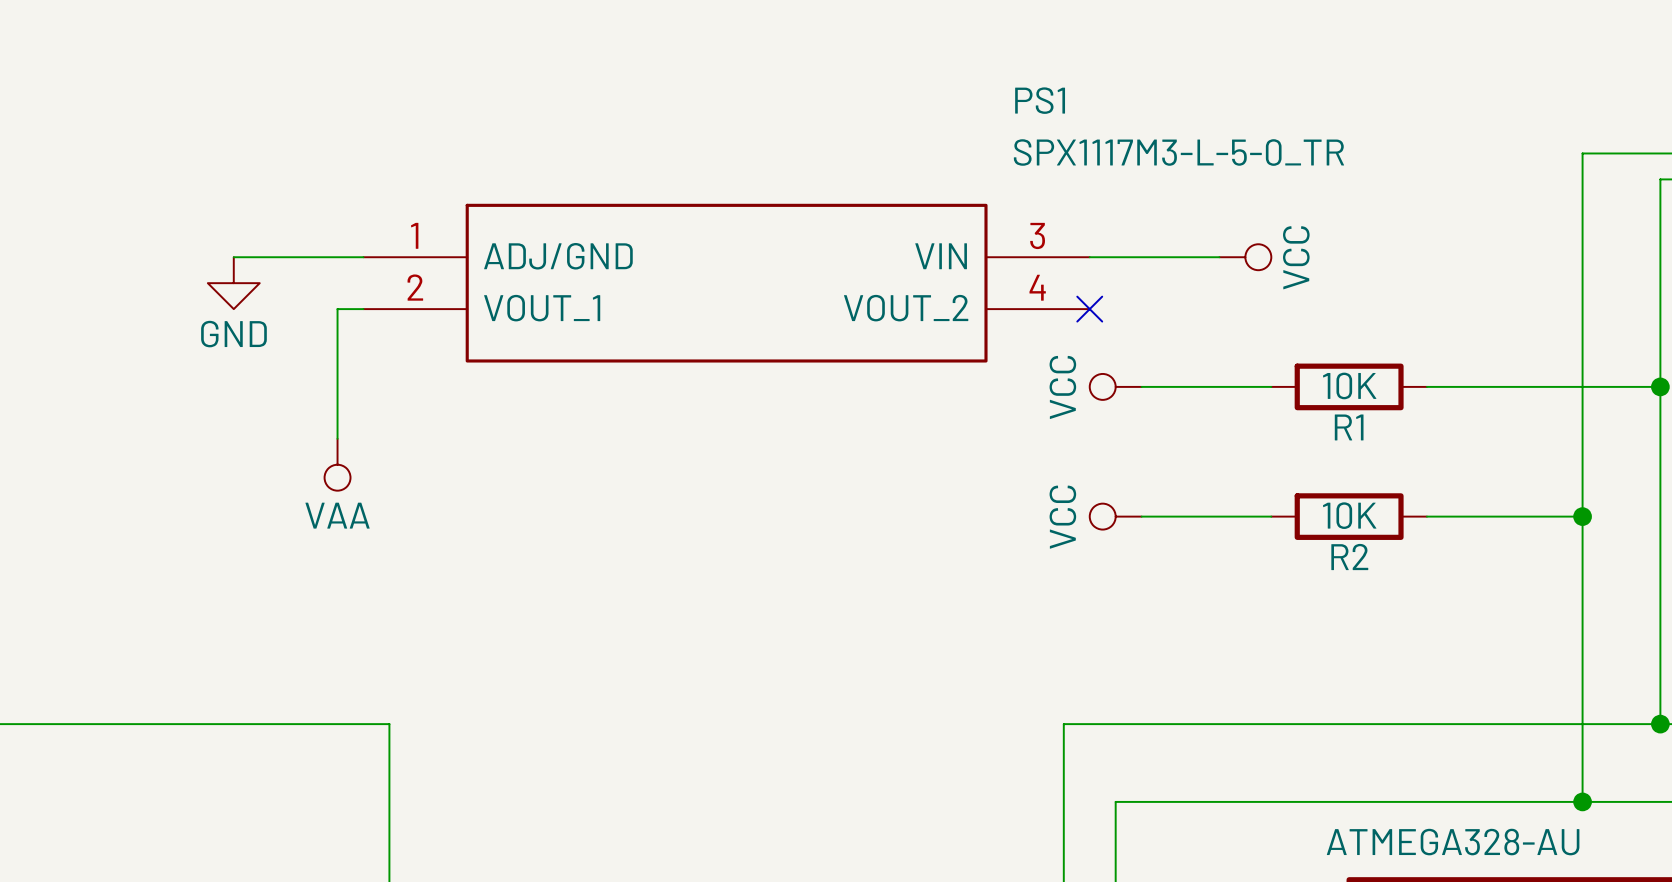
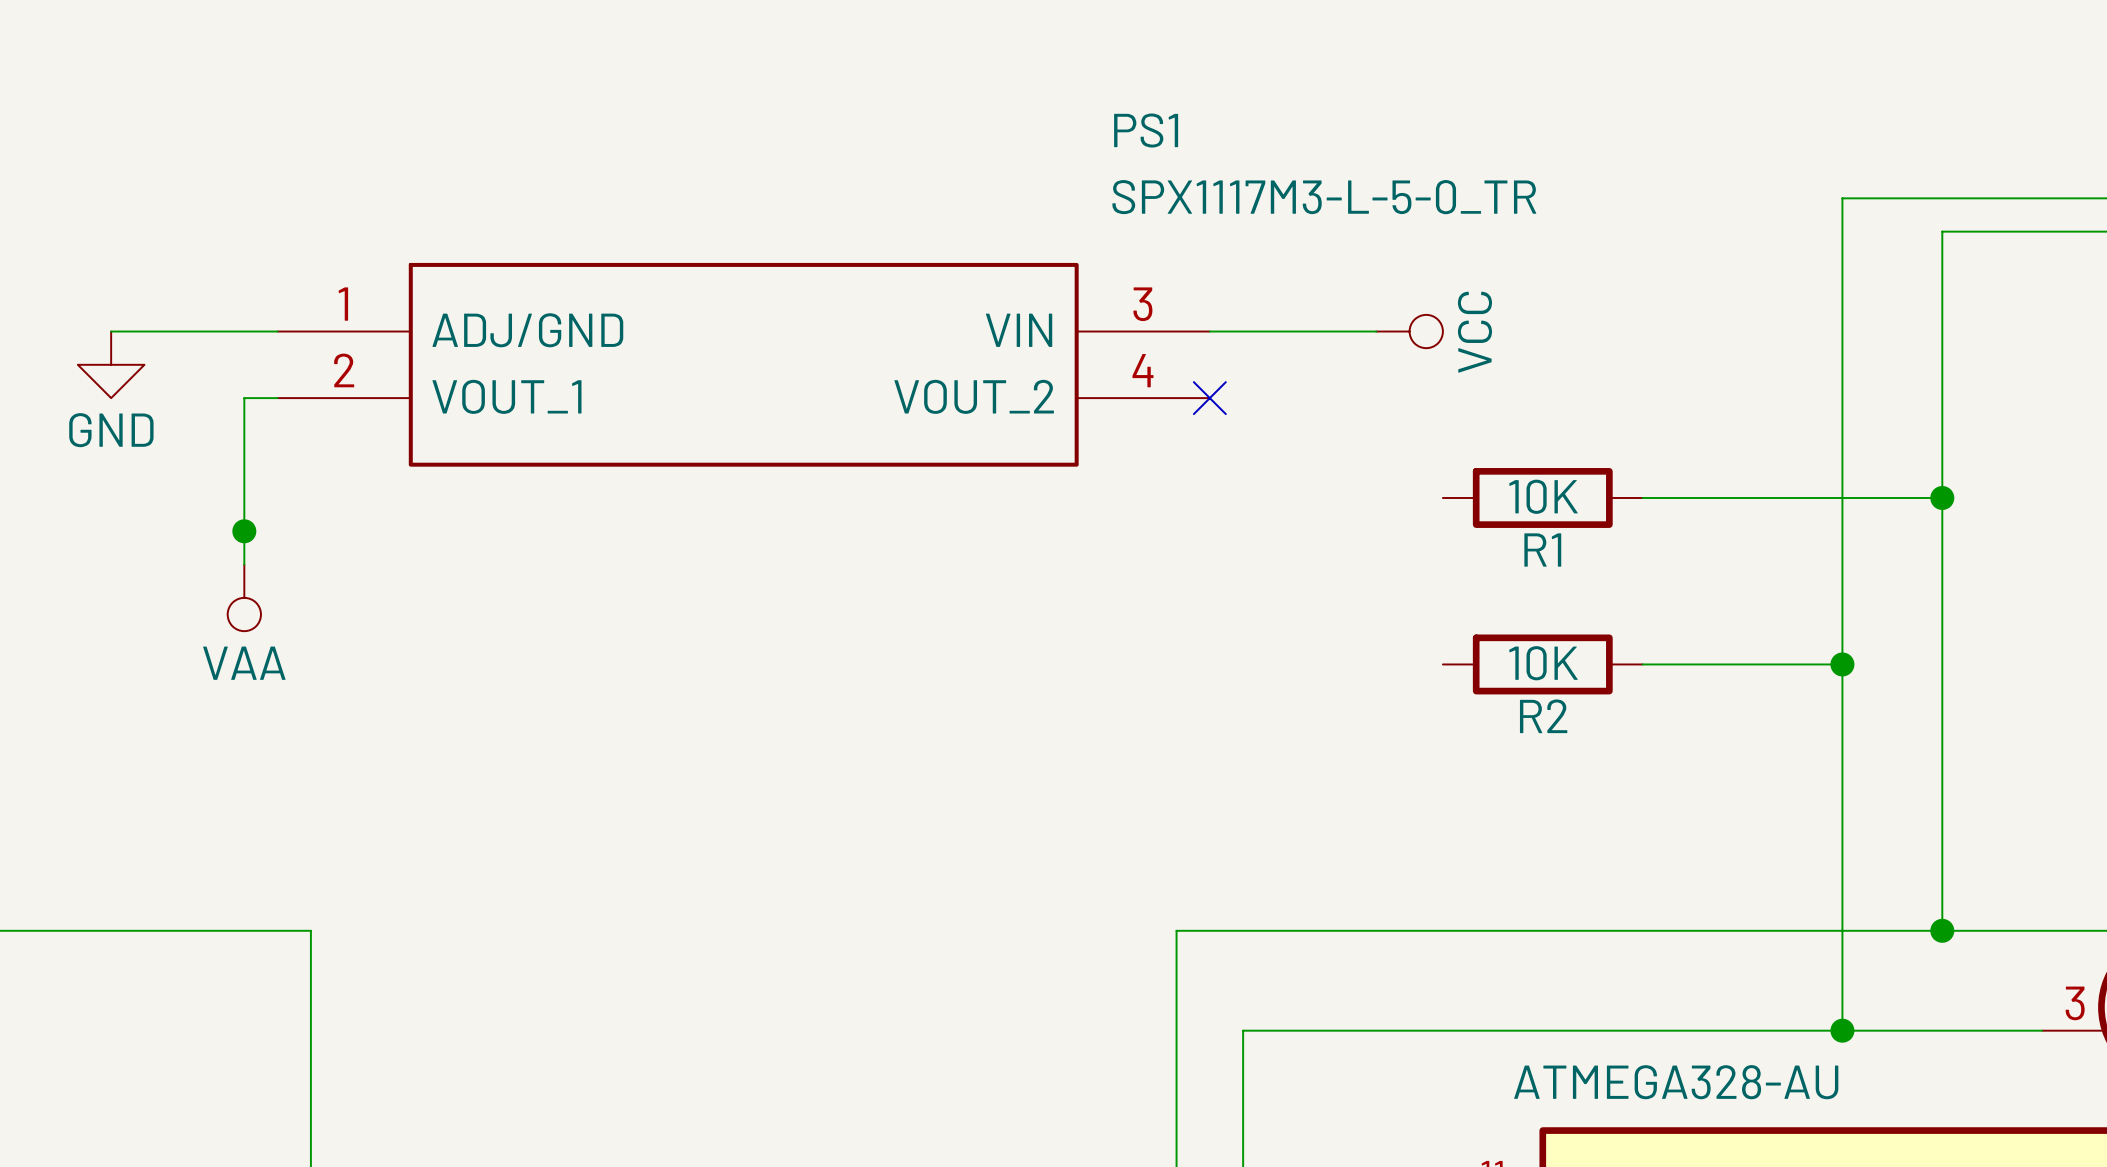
power symbol: VCC (1115, 386) -> none
wire: (1141, 386) (1271, 386) -> none
junction: none -> (244, 531)
power symbol: VCC (1115, 516) -> none
wire: (1141, 516) (1271, 516) -> none

